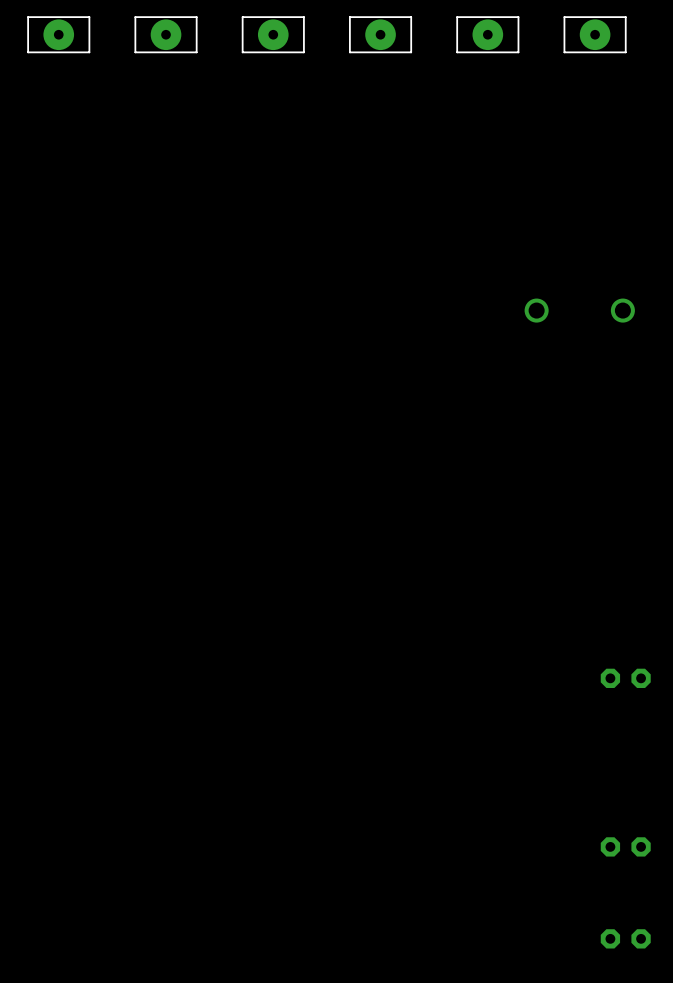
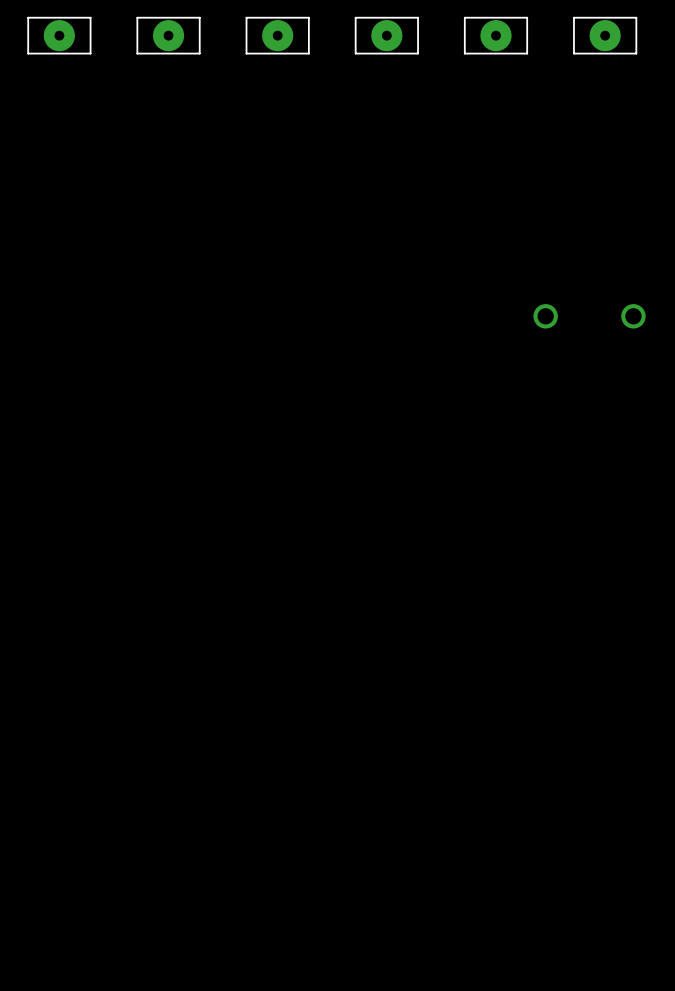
part: (625, 678) -> none
part: (625, 846) -> none
part: (625, 938) -> none

